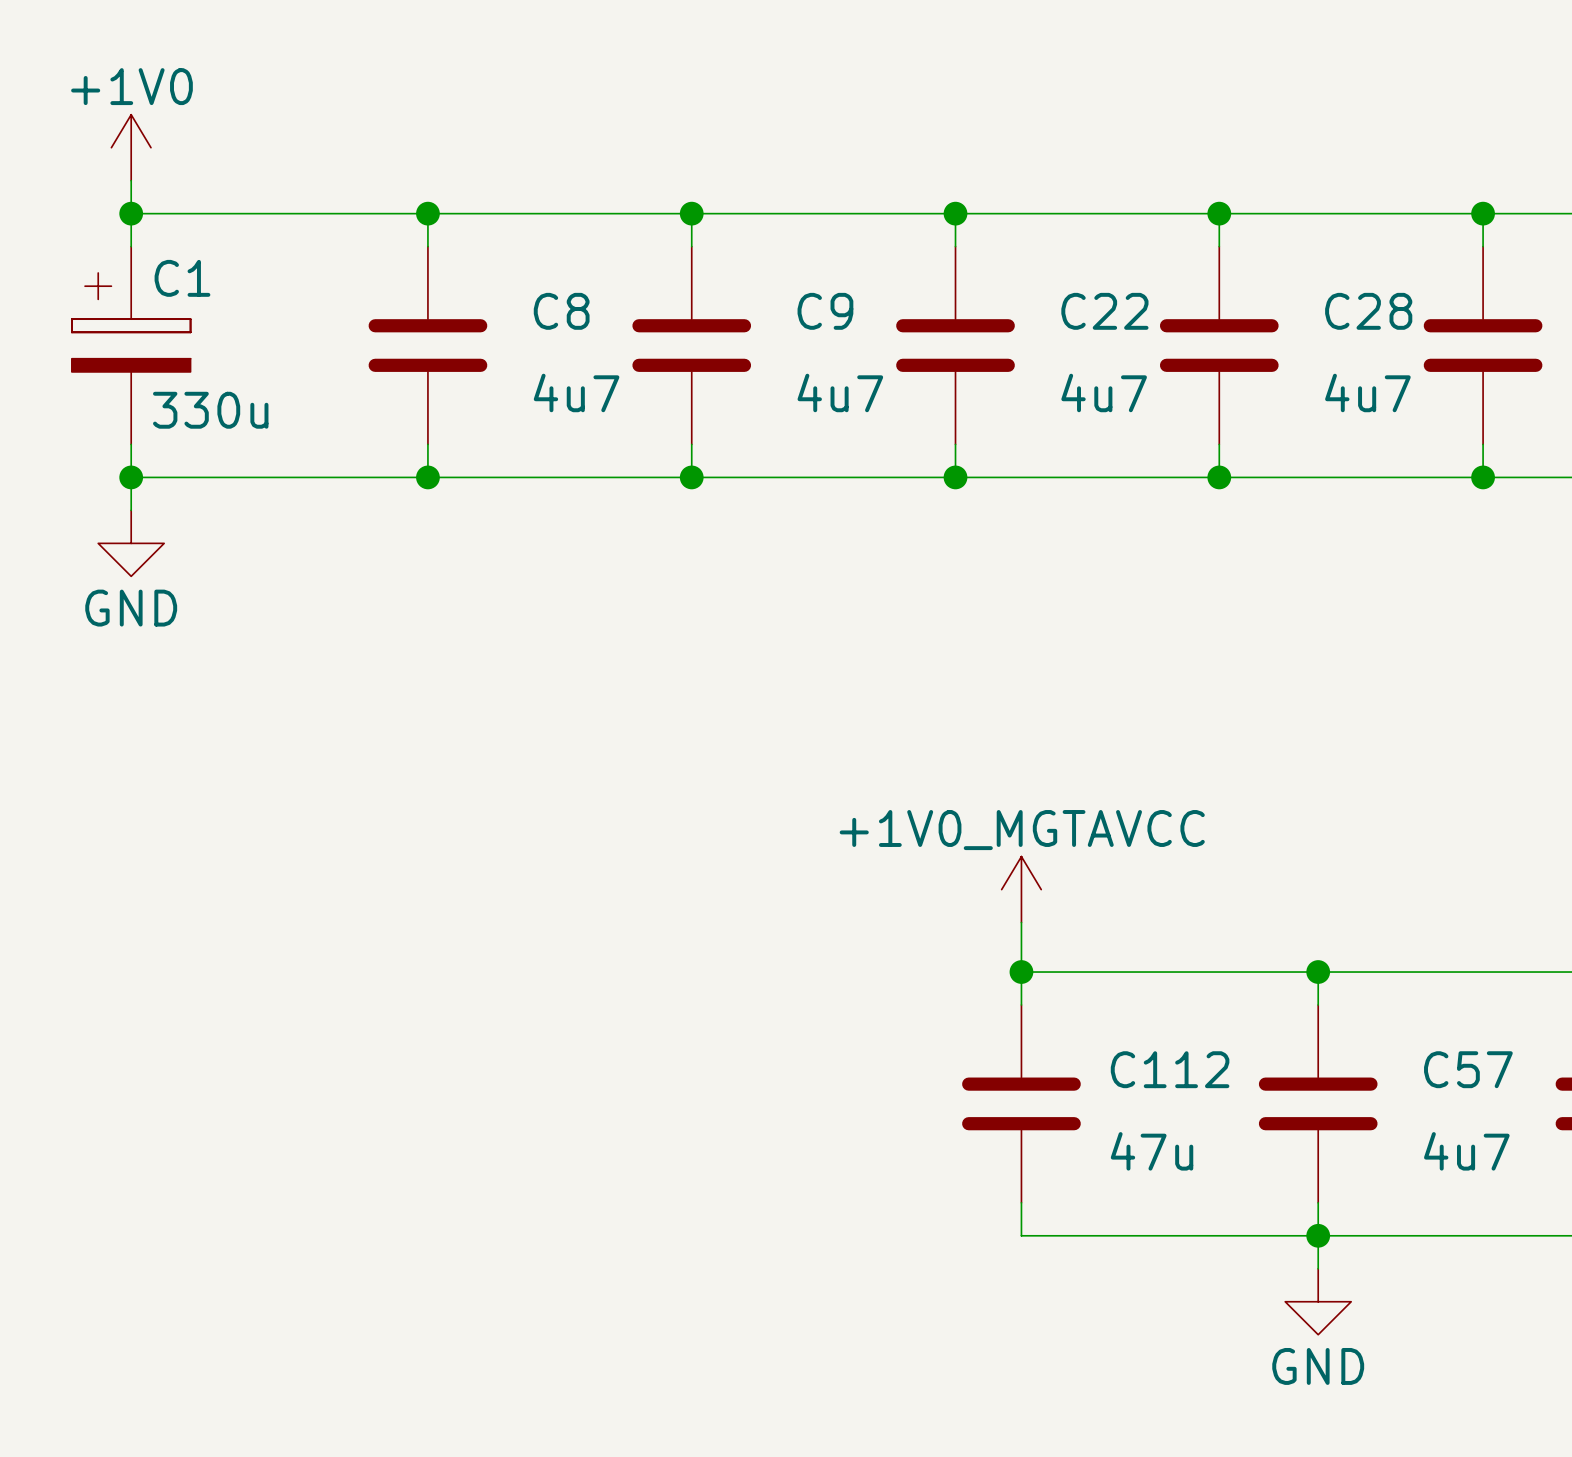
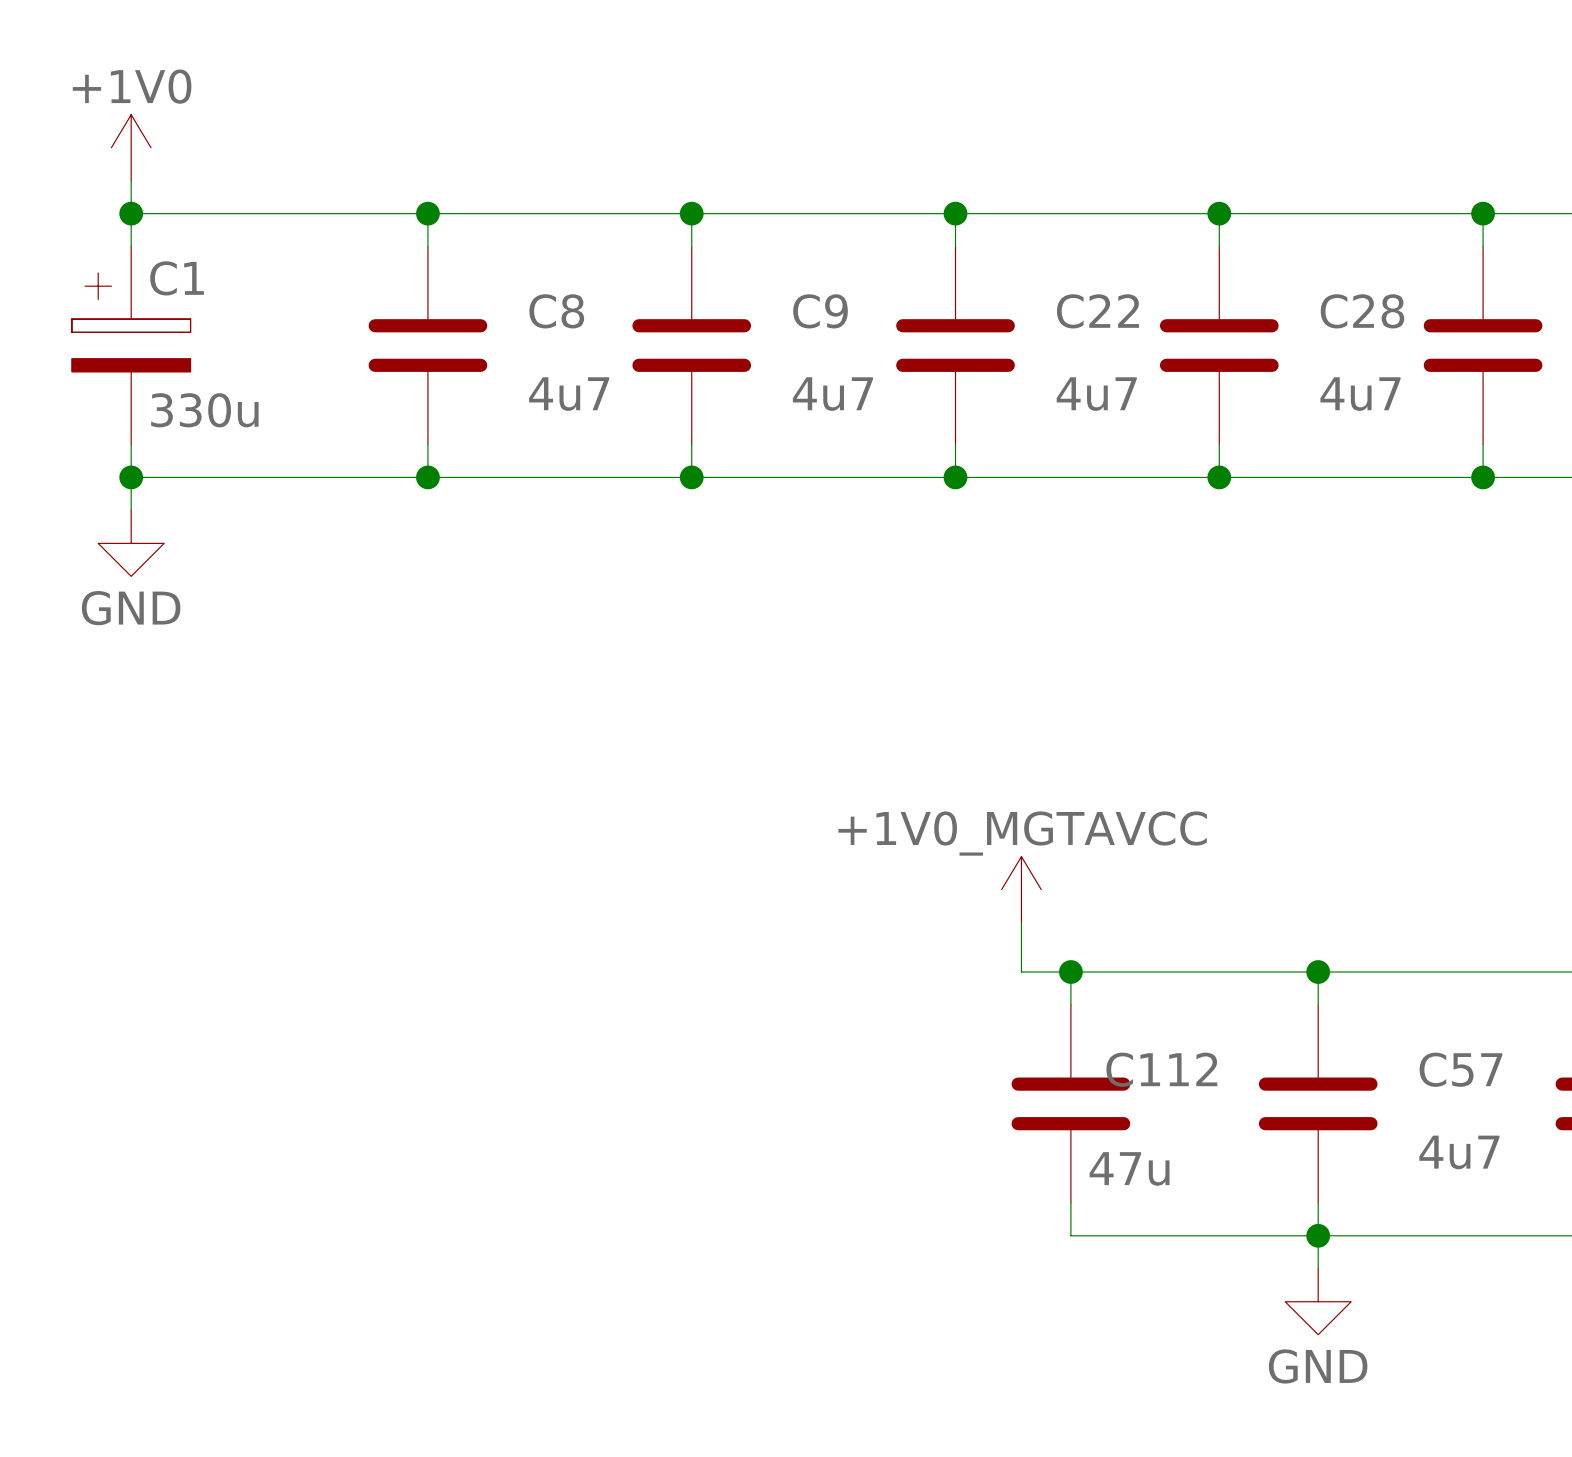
wire: (1021, 972) (1021, 1004) -> (1070, 972) (1070, 1004)
junction position: (1021, 972) -> (1070, 972)
C112 position: (1021, 1103) -> (1070, 1103)
C112 text position: 47u (1152, 1151) -> 47u (1129, 1168)
wire: (1021, 1202) (1021, 1235) (1070, 1235) -> (1070, 1202) (1070, 1235)

